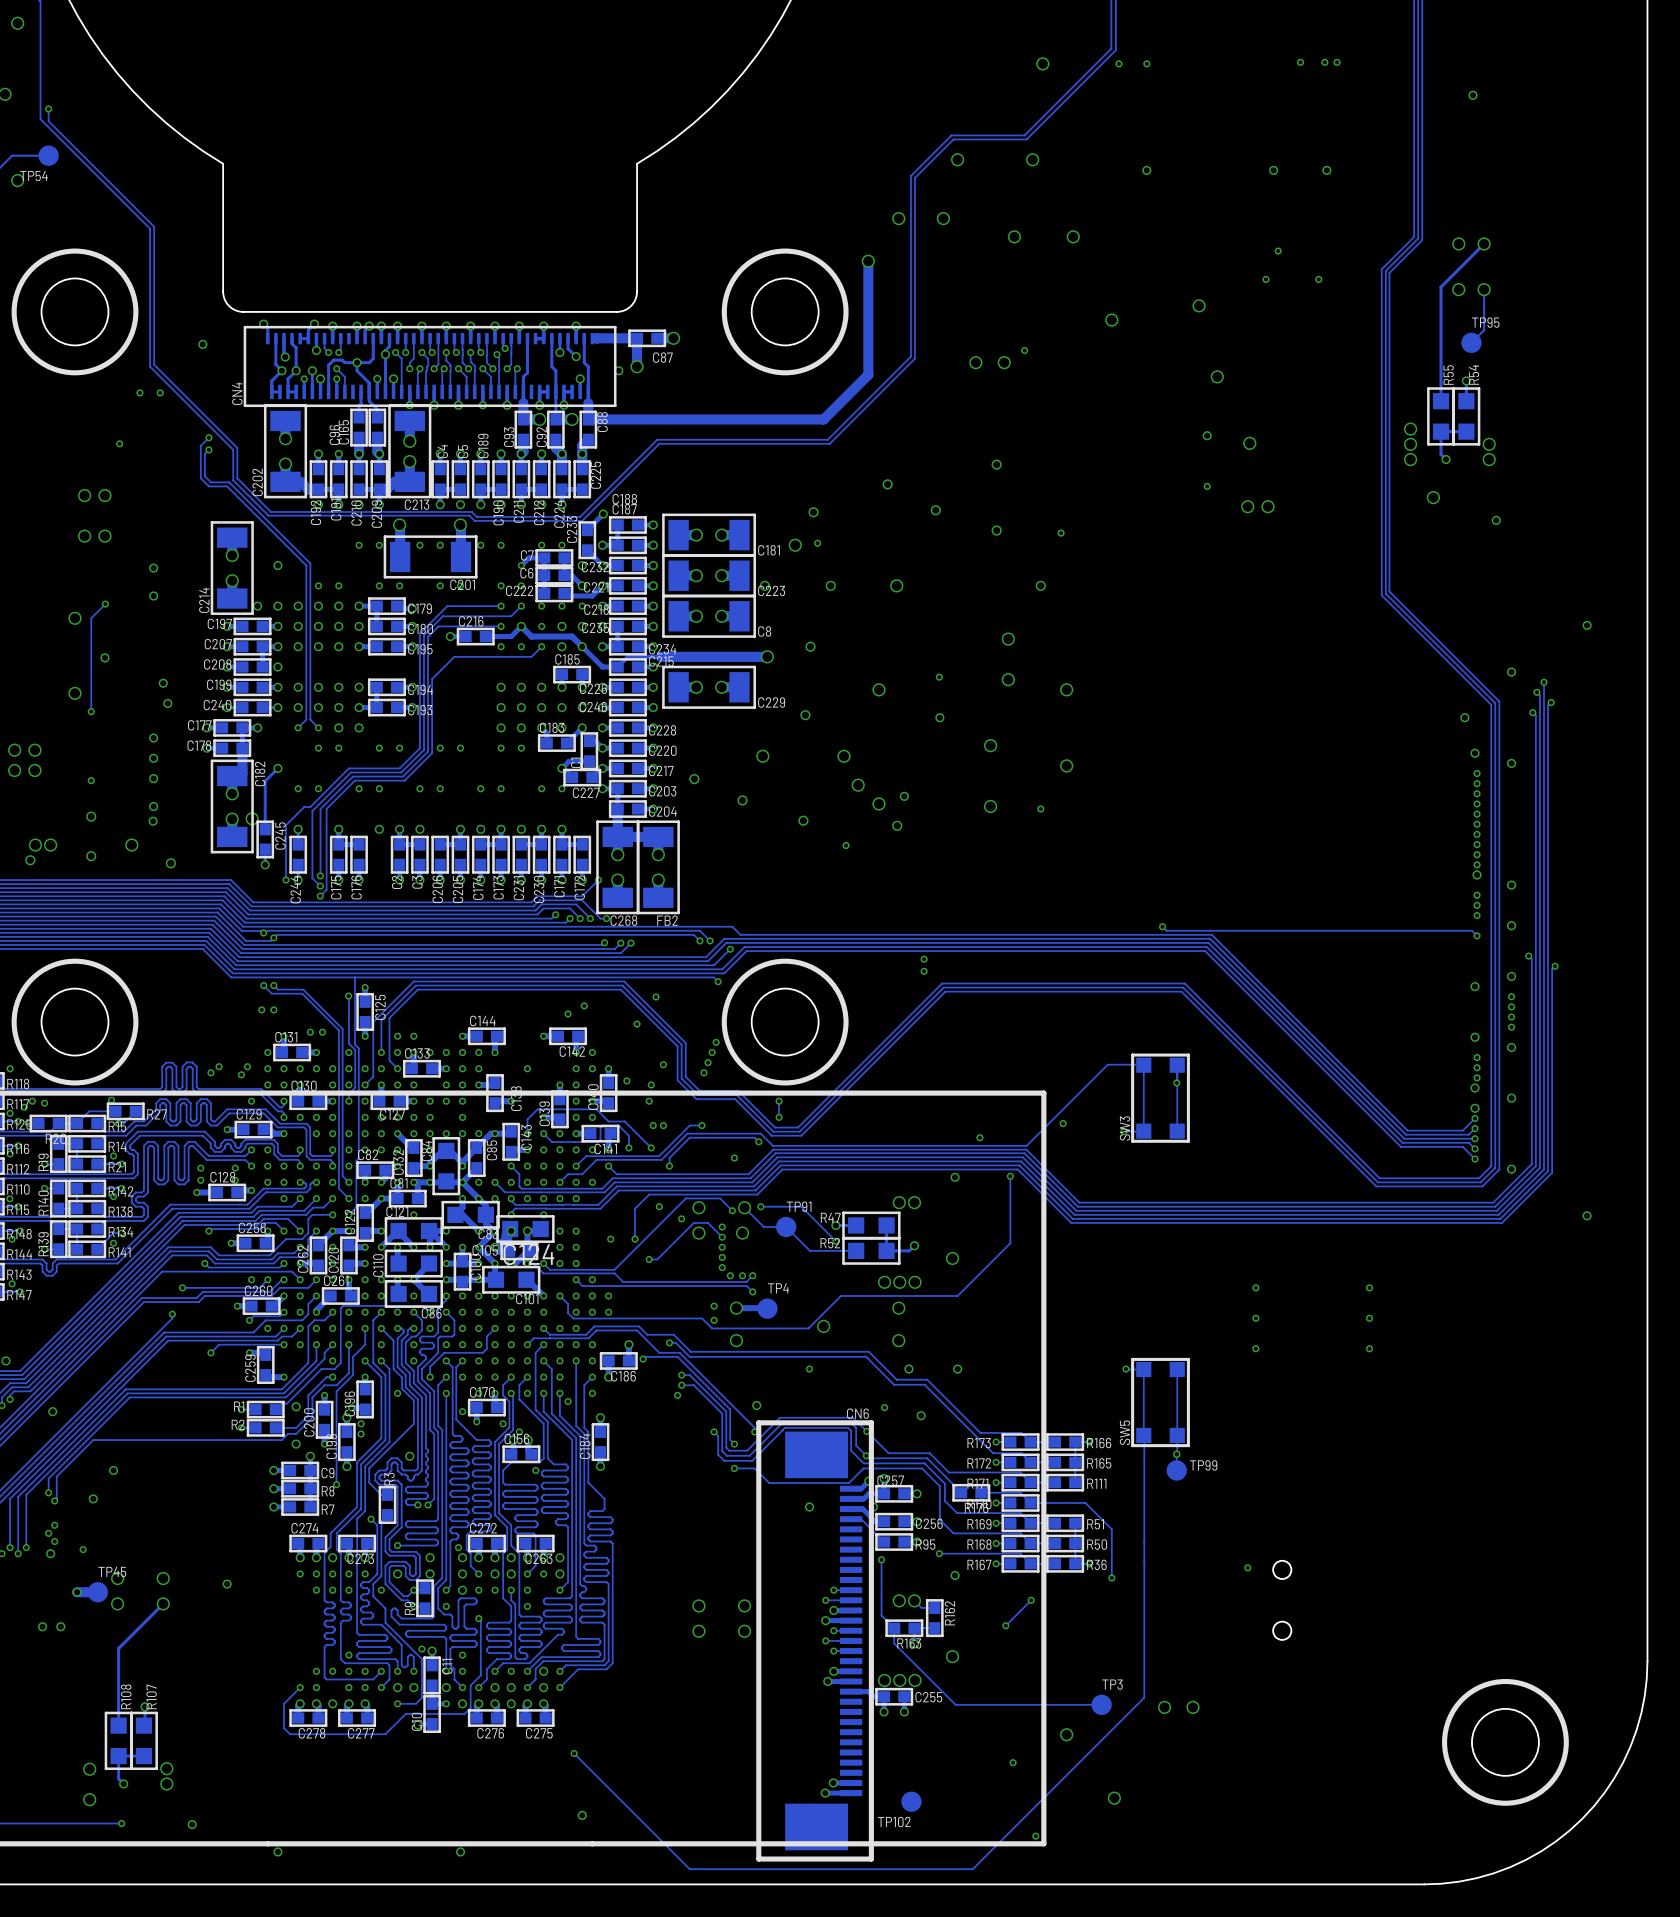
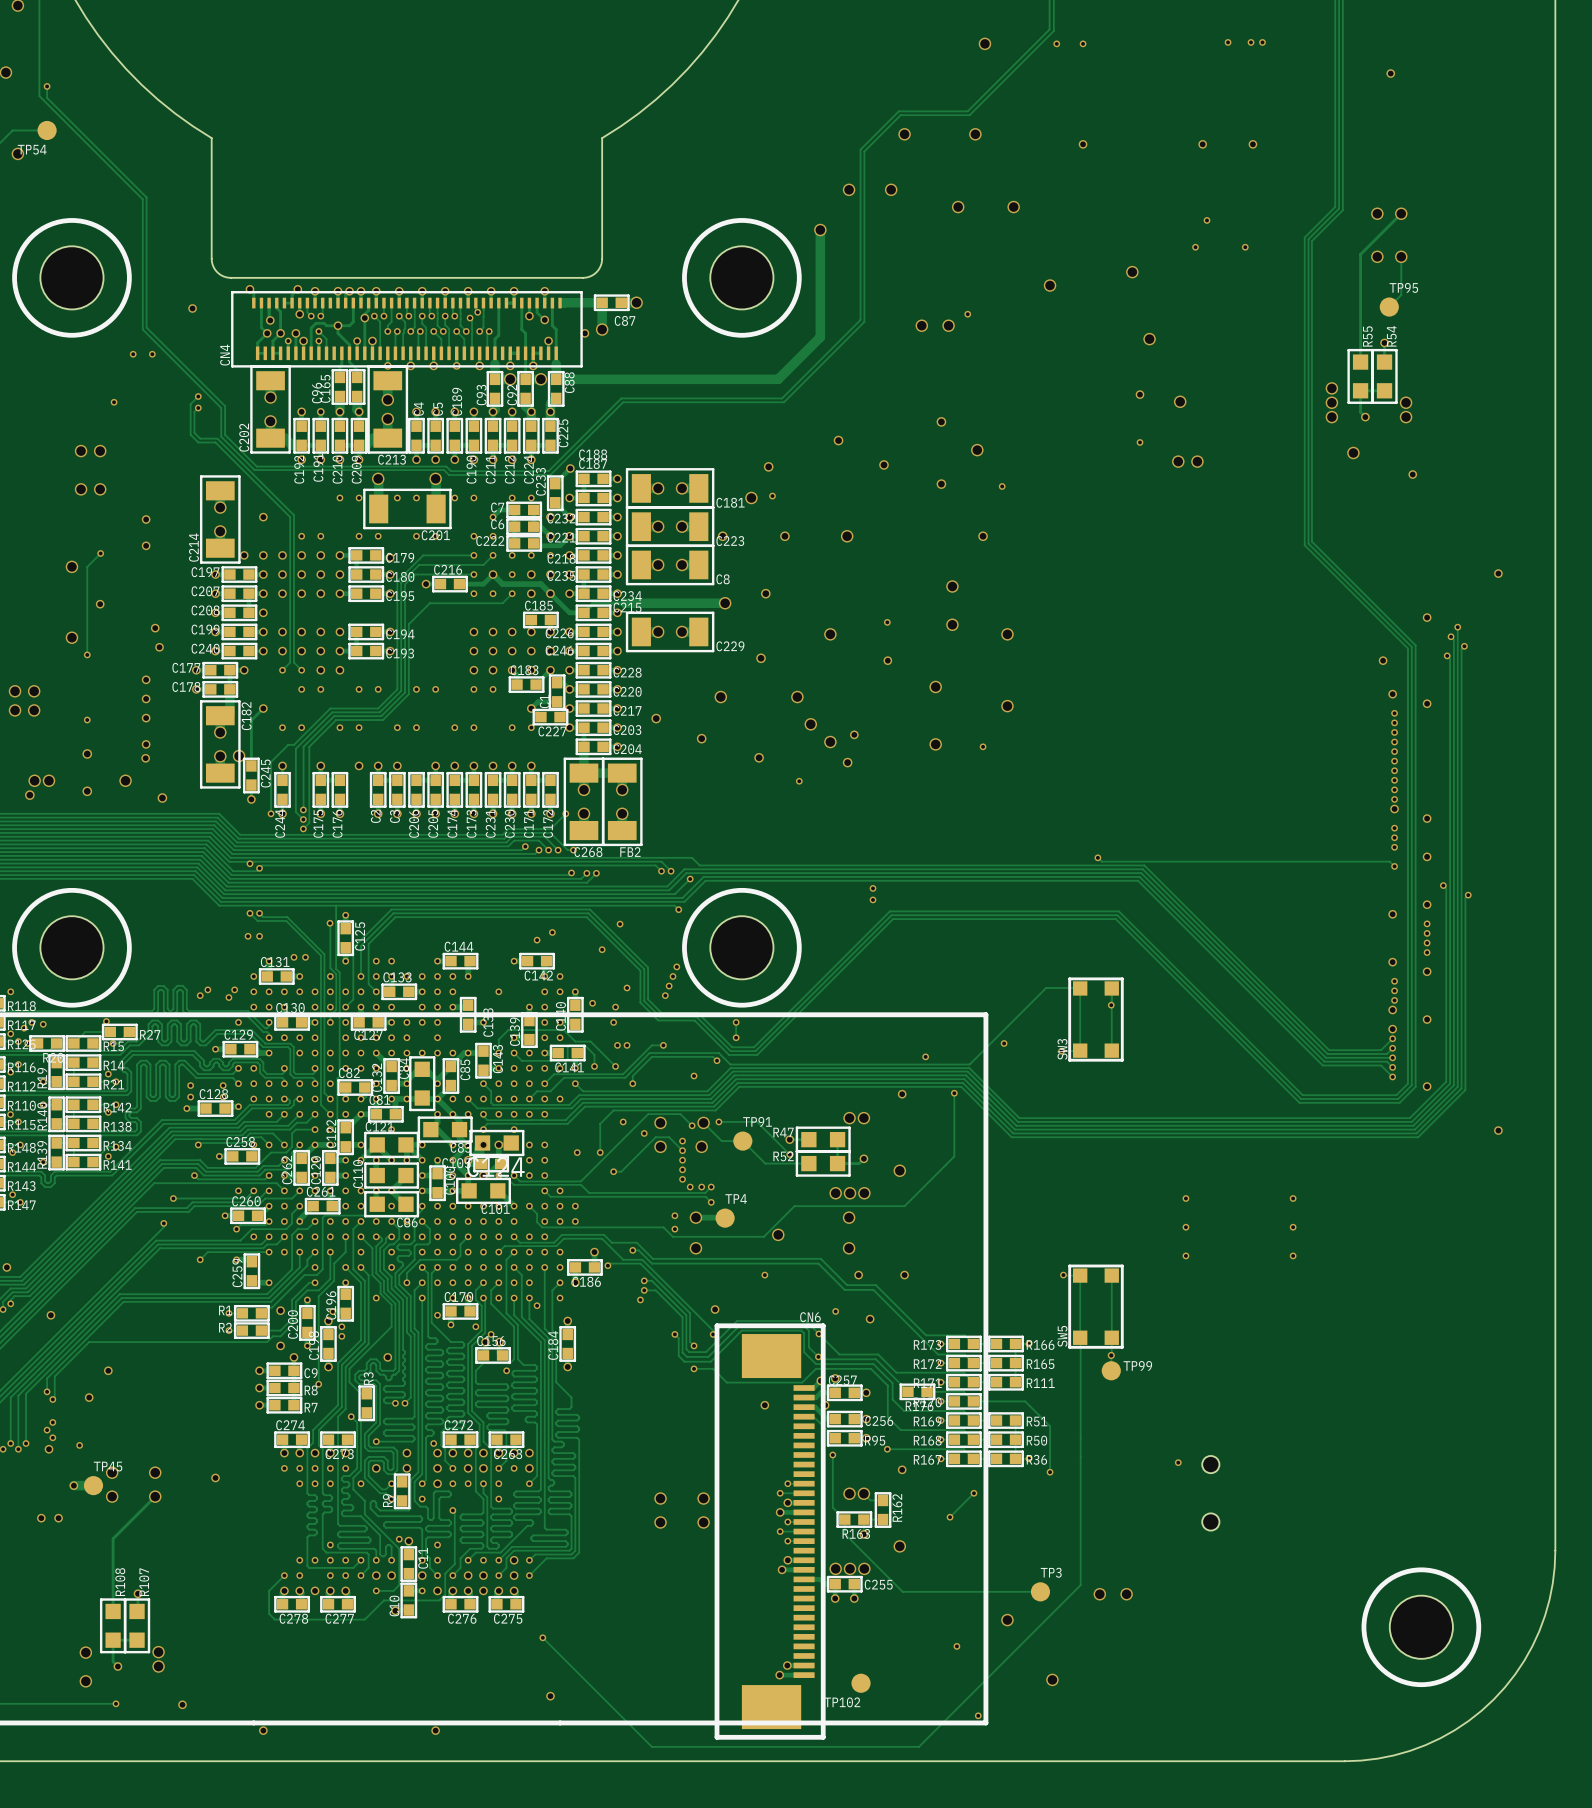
via: none -> (977, 450)

